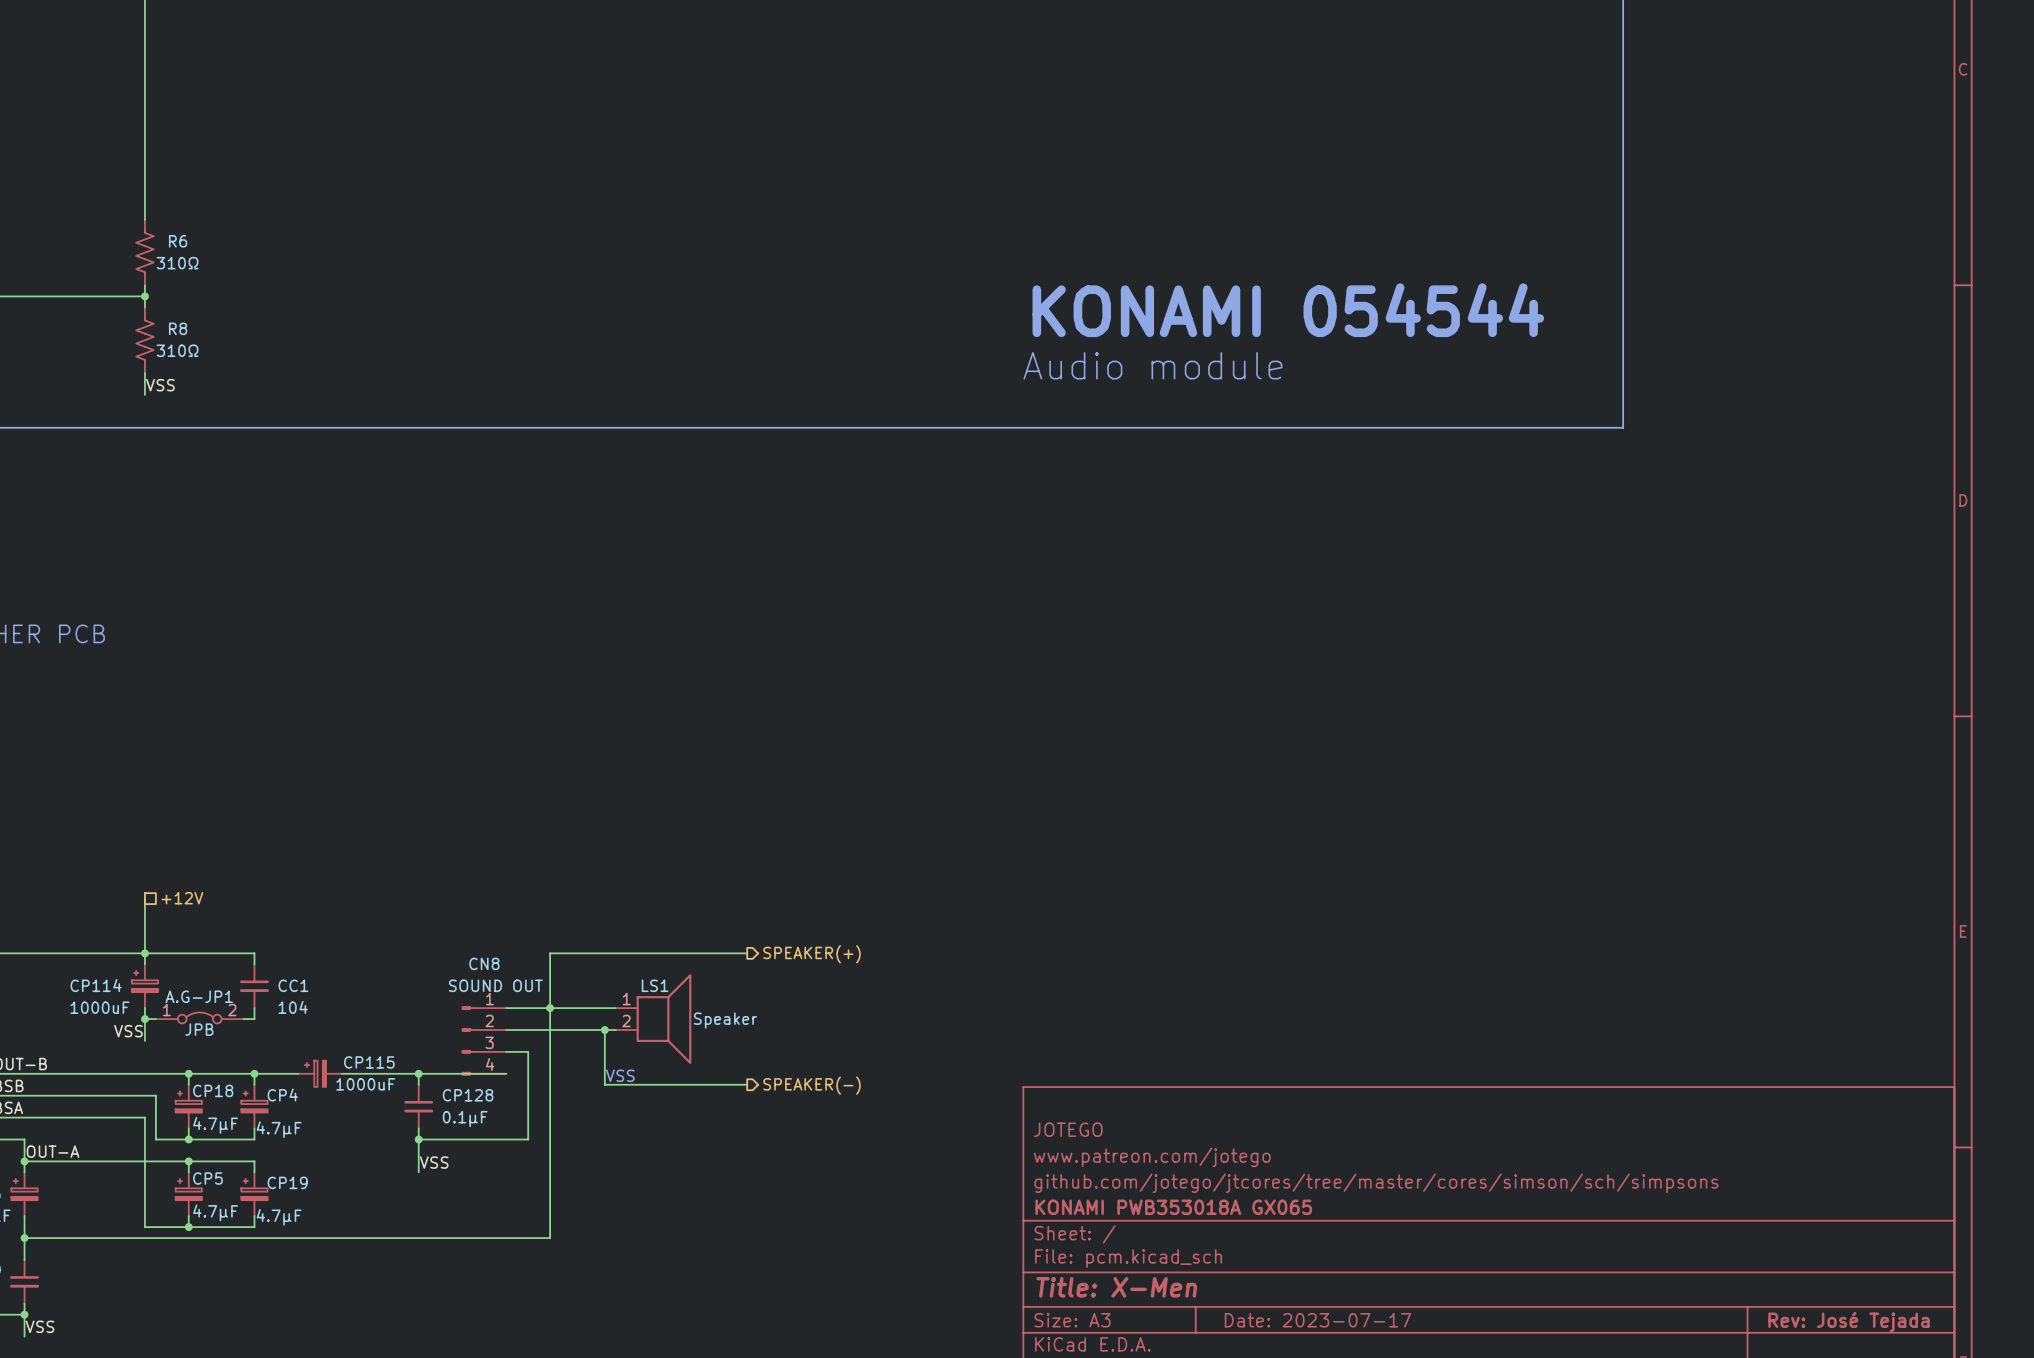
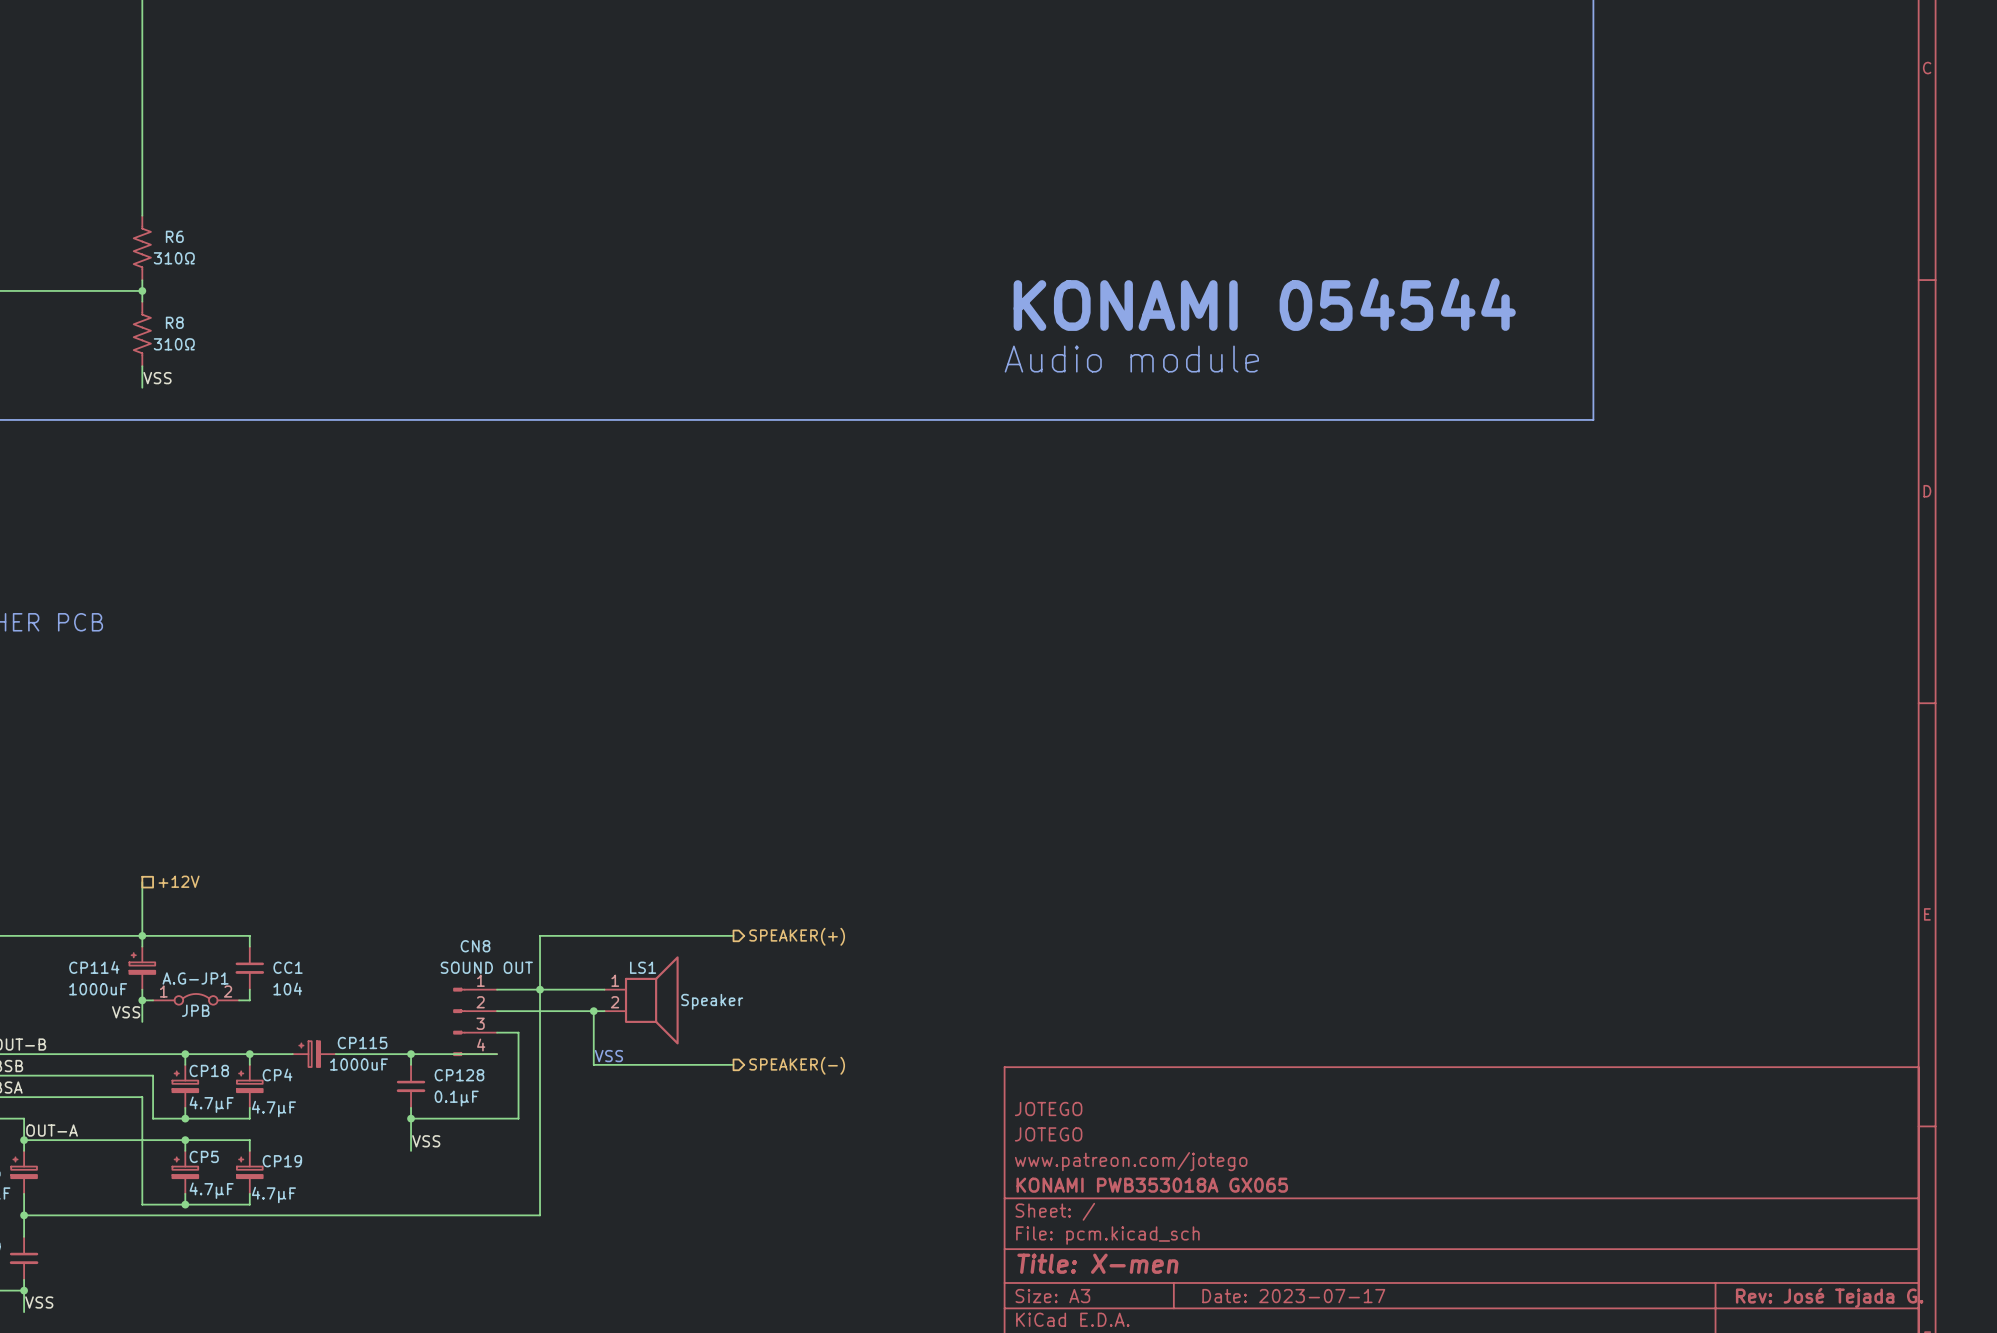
title block: www.patreon.com/jotego (1152, 1157) -> JOTEGO (1048, 1134)
title block: github.com/jotego/jtcores/tree/master/cores/simson/sch/simpsons (1376, 1183) -> www.patreon.com/jotego (1131, 1161)
title block: Title: X-Men (1116, 1287) -> Title: X-men (1097, 1263)
title block: Rev: José Tejada (1849, 1322) -> Rev: José Tejada G. (1829, 1297)

